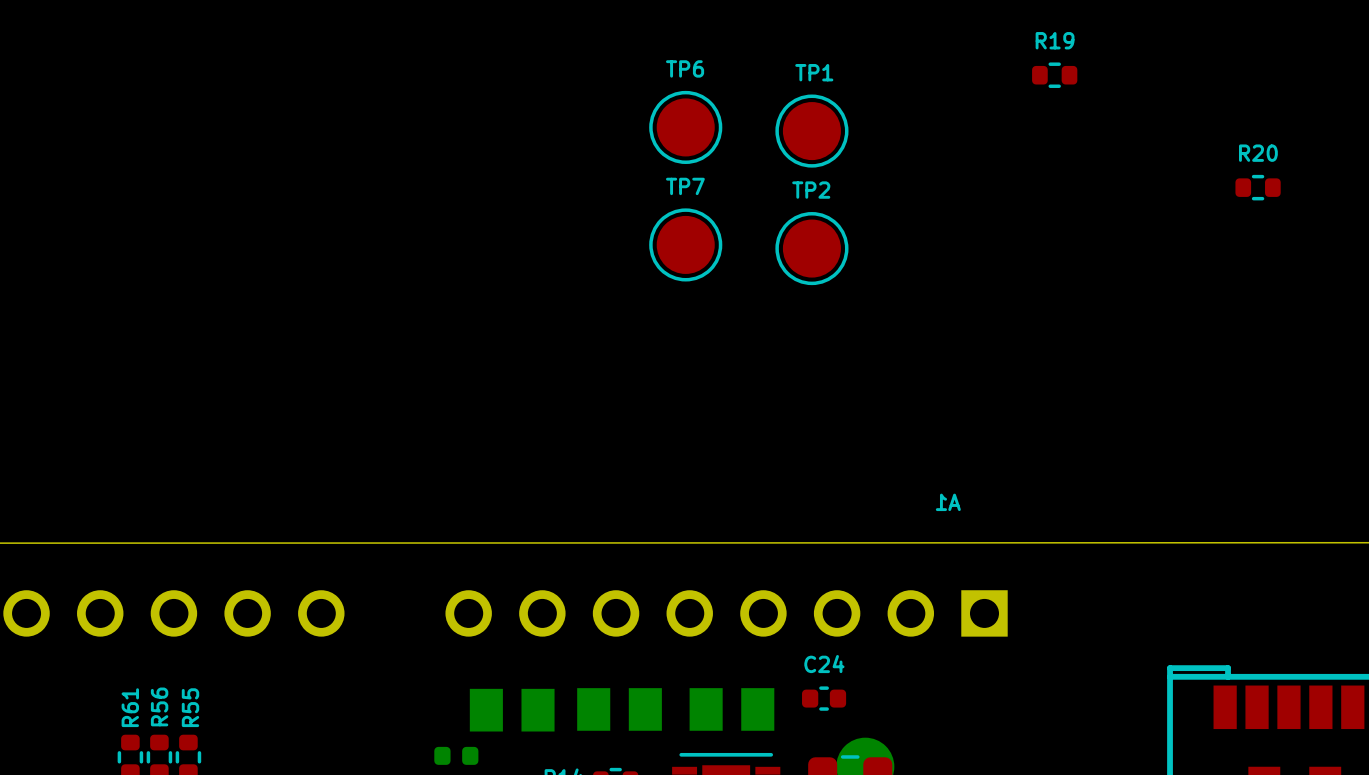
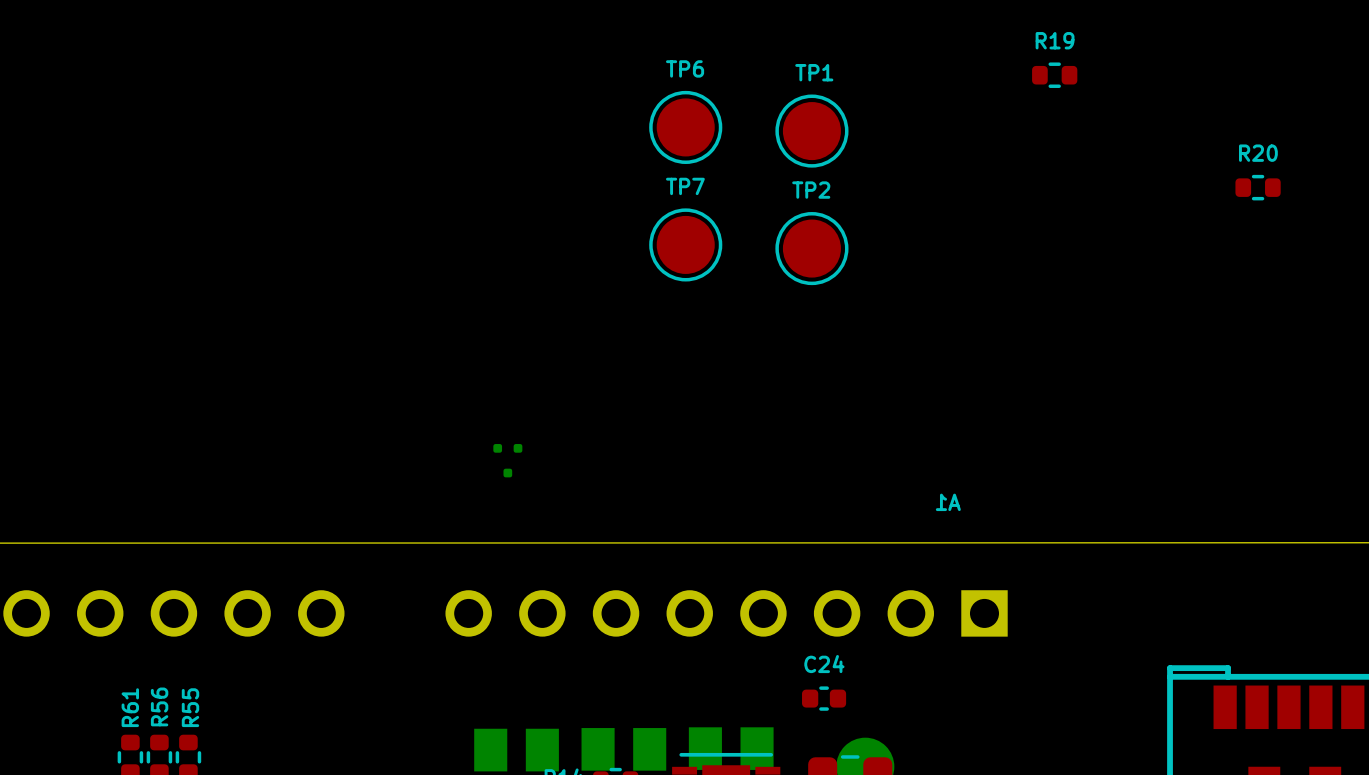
part: none -> (507, 460)
part position: (619, 709) -> (623, 749)
part position: (731, 709) -> (731, 748)
part position: (512, 710) -> (516, 750)
part: (456, 755) -> none

